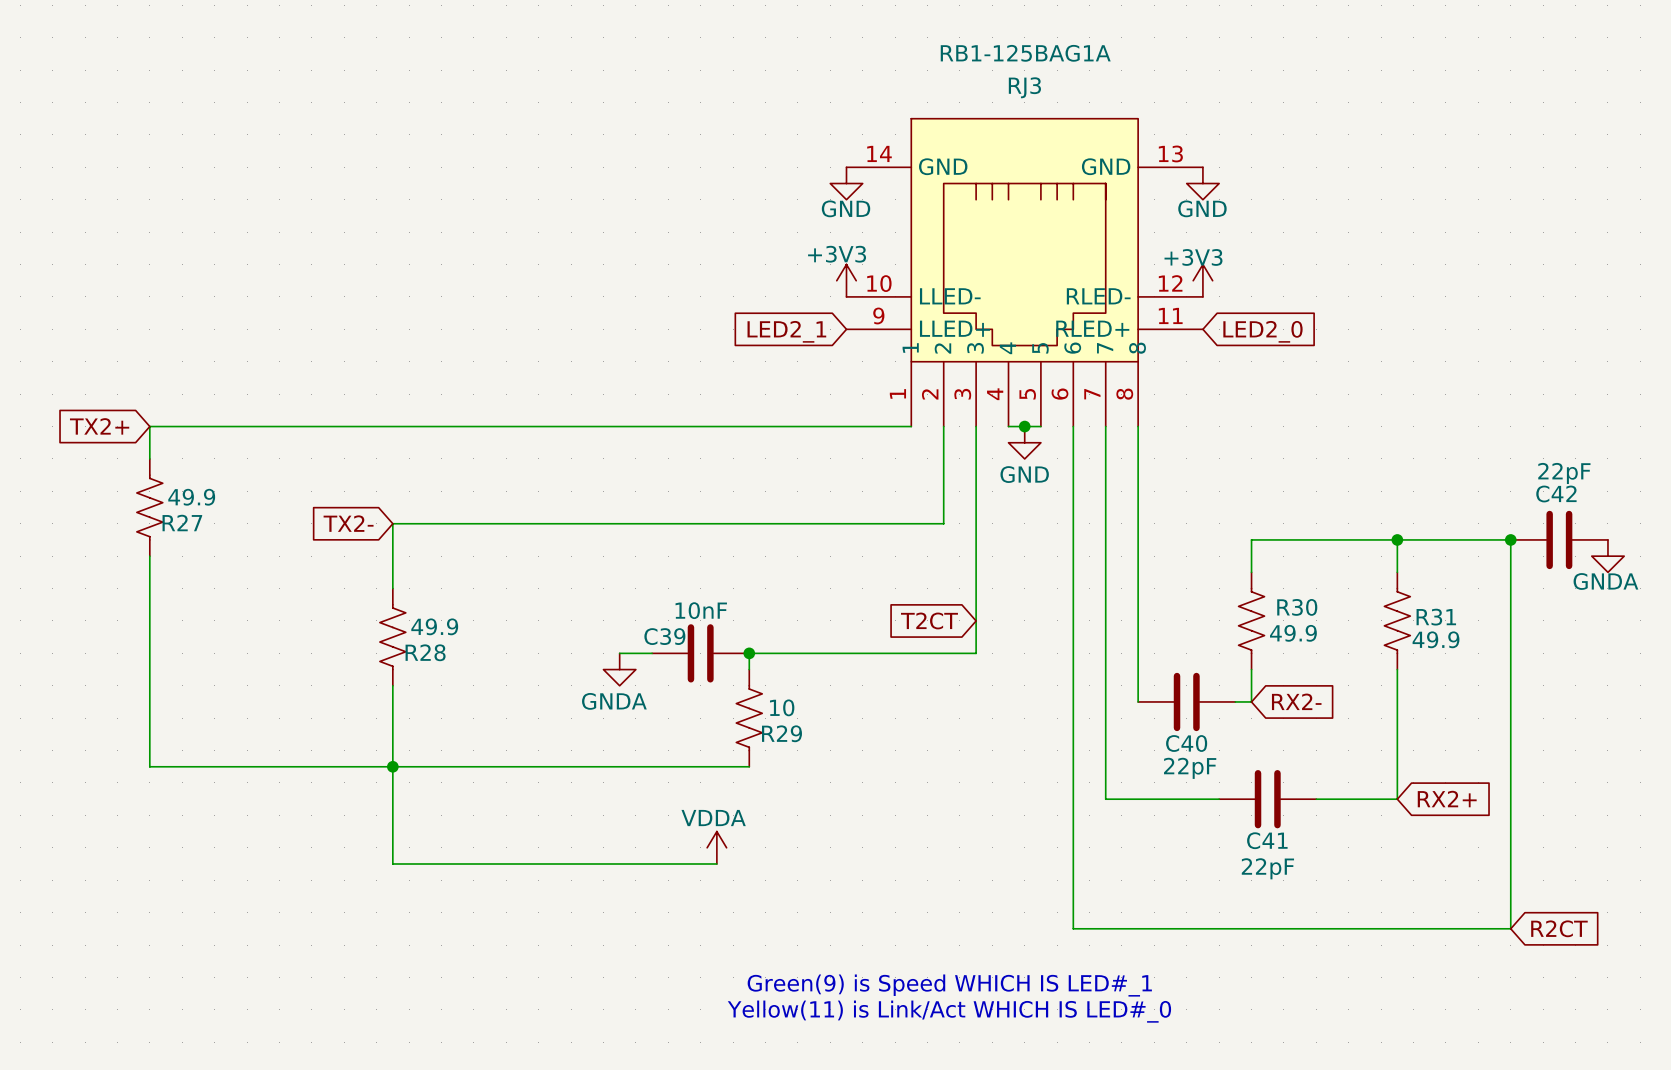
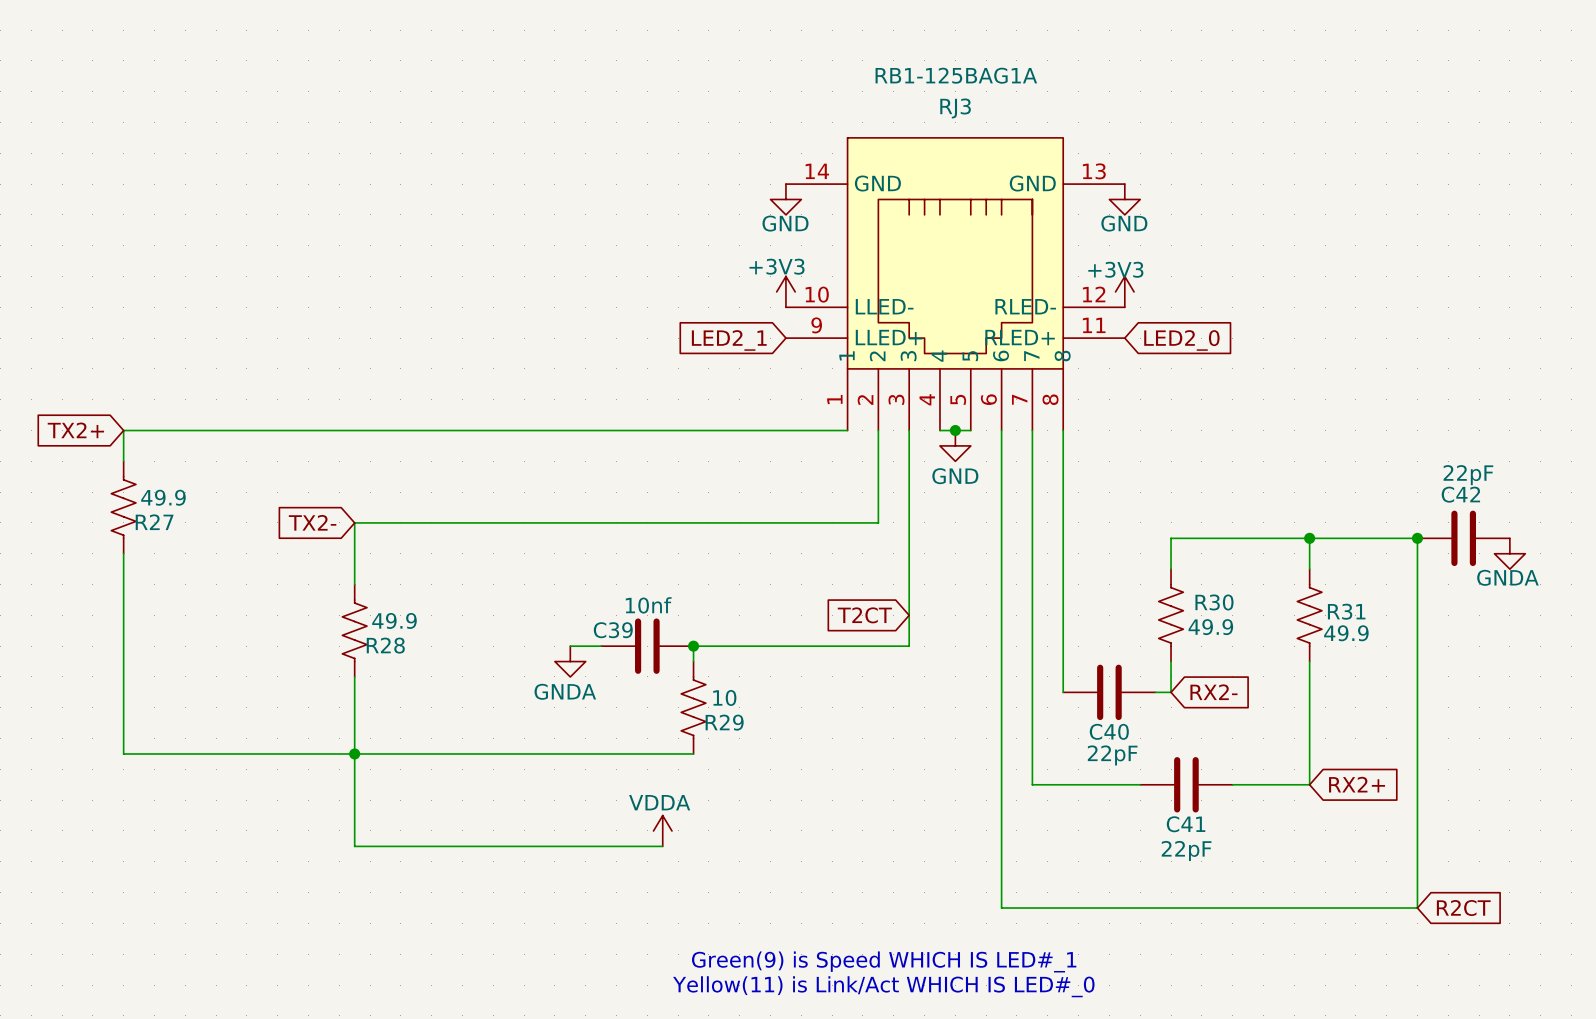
C39 value: 10nF (701, 610) -> 10nf (648, 605)

